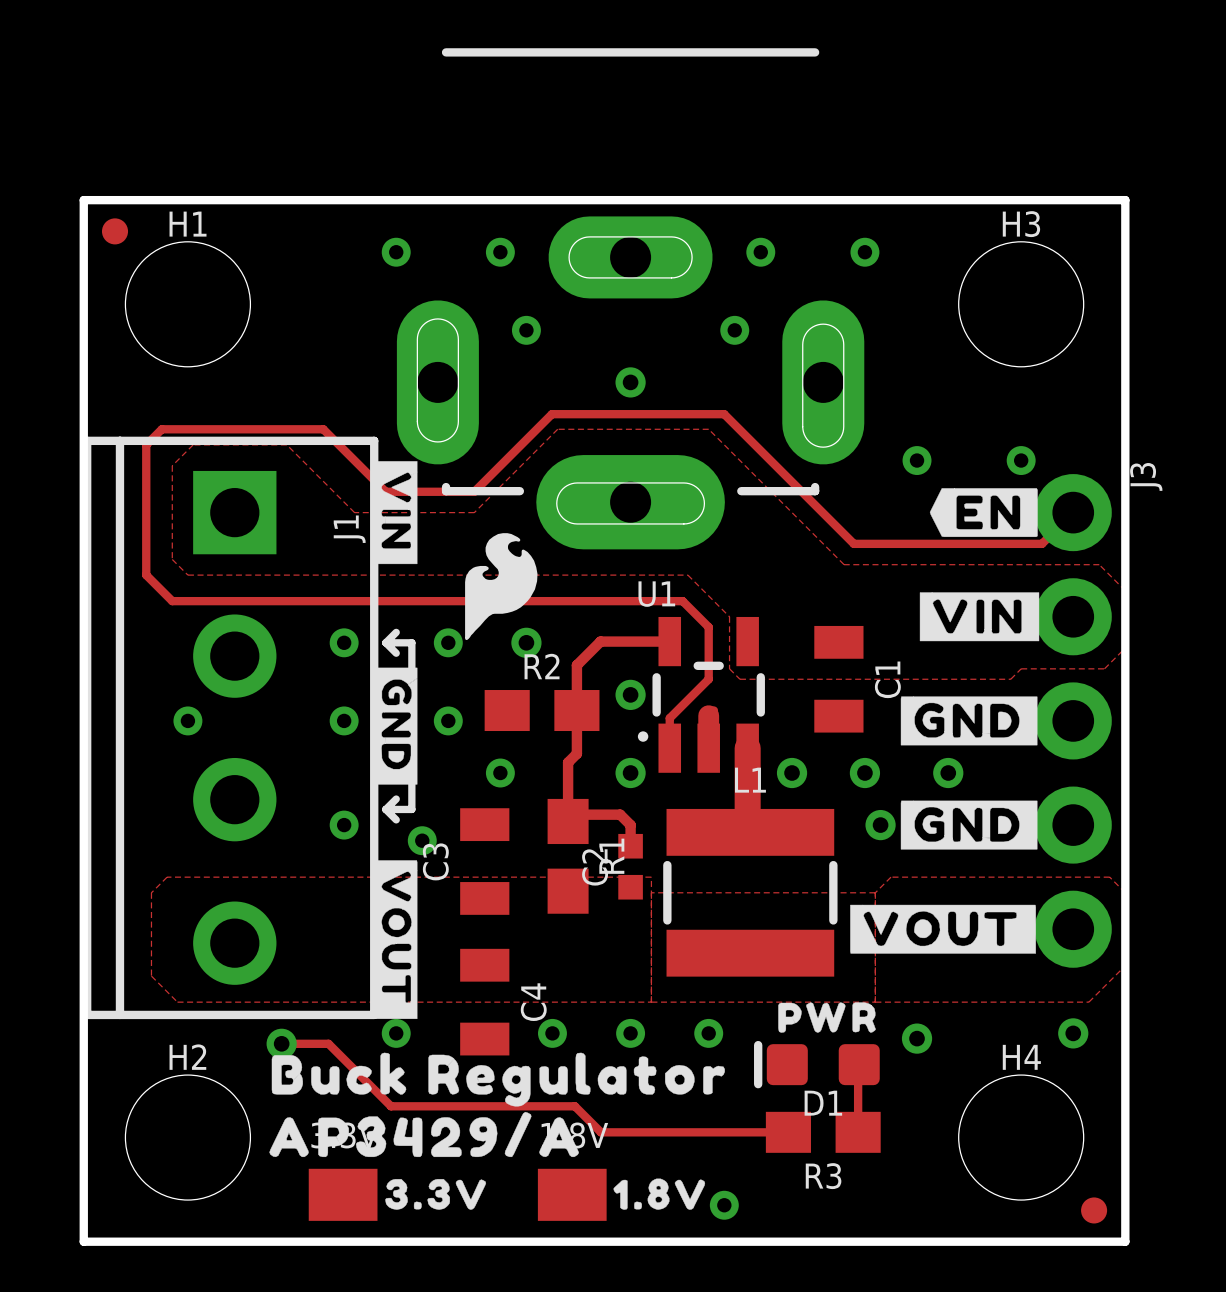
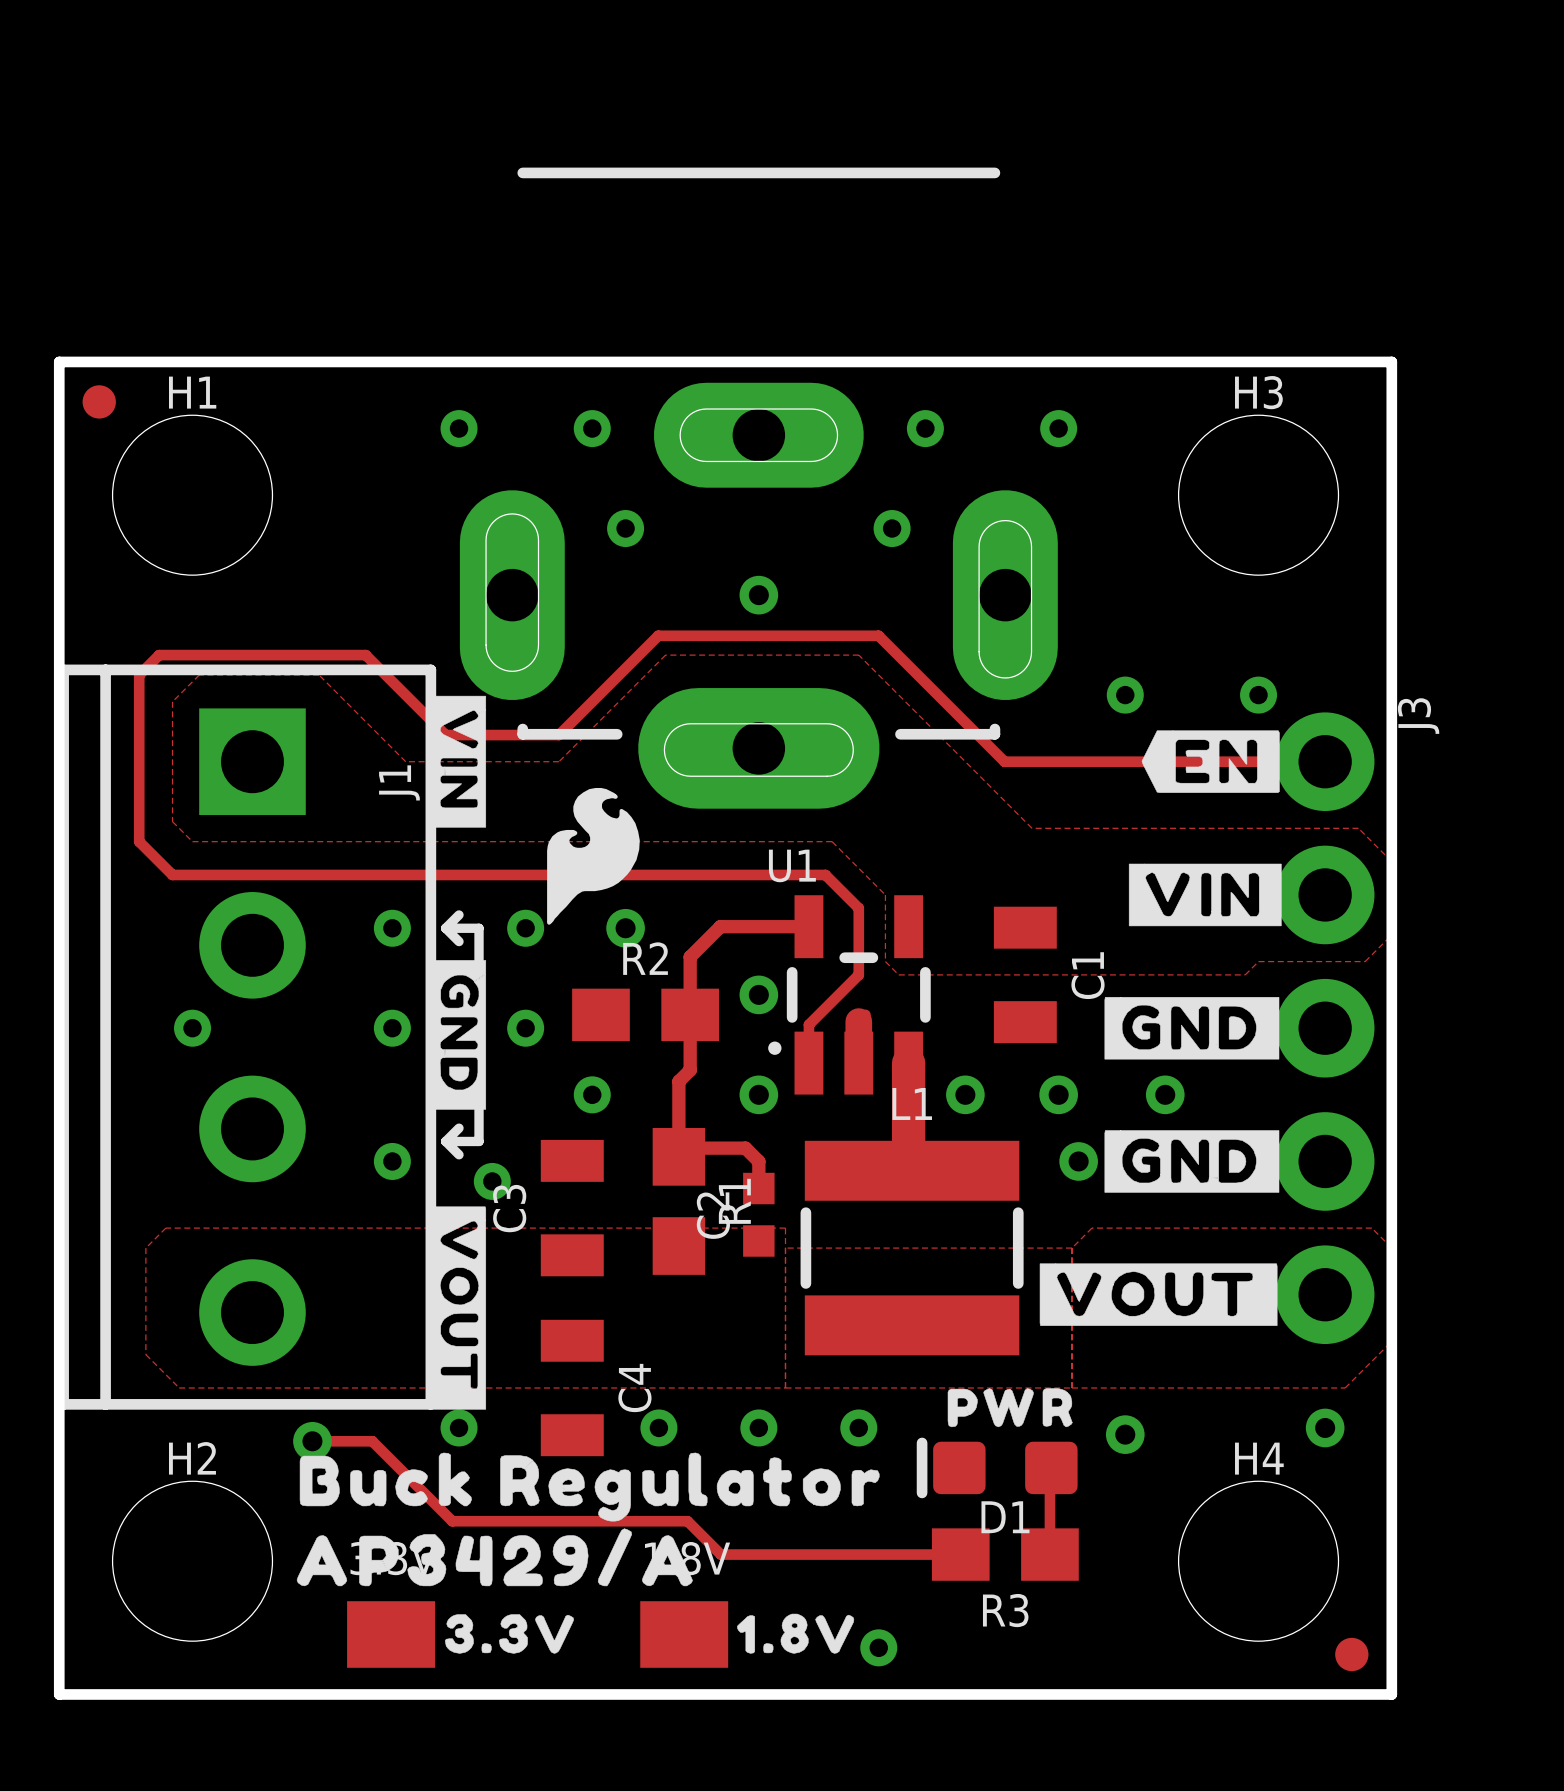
track: (822, 512) (853, 543) (1042, 543) (1073, 512) -> (1004, 761) (1325, 761)

